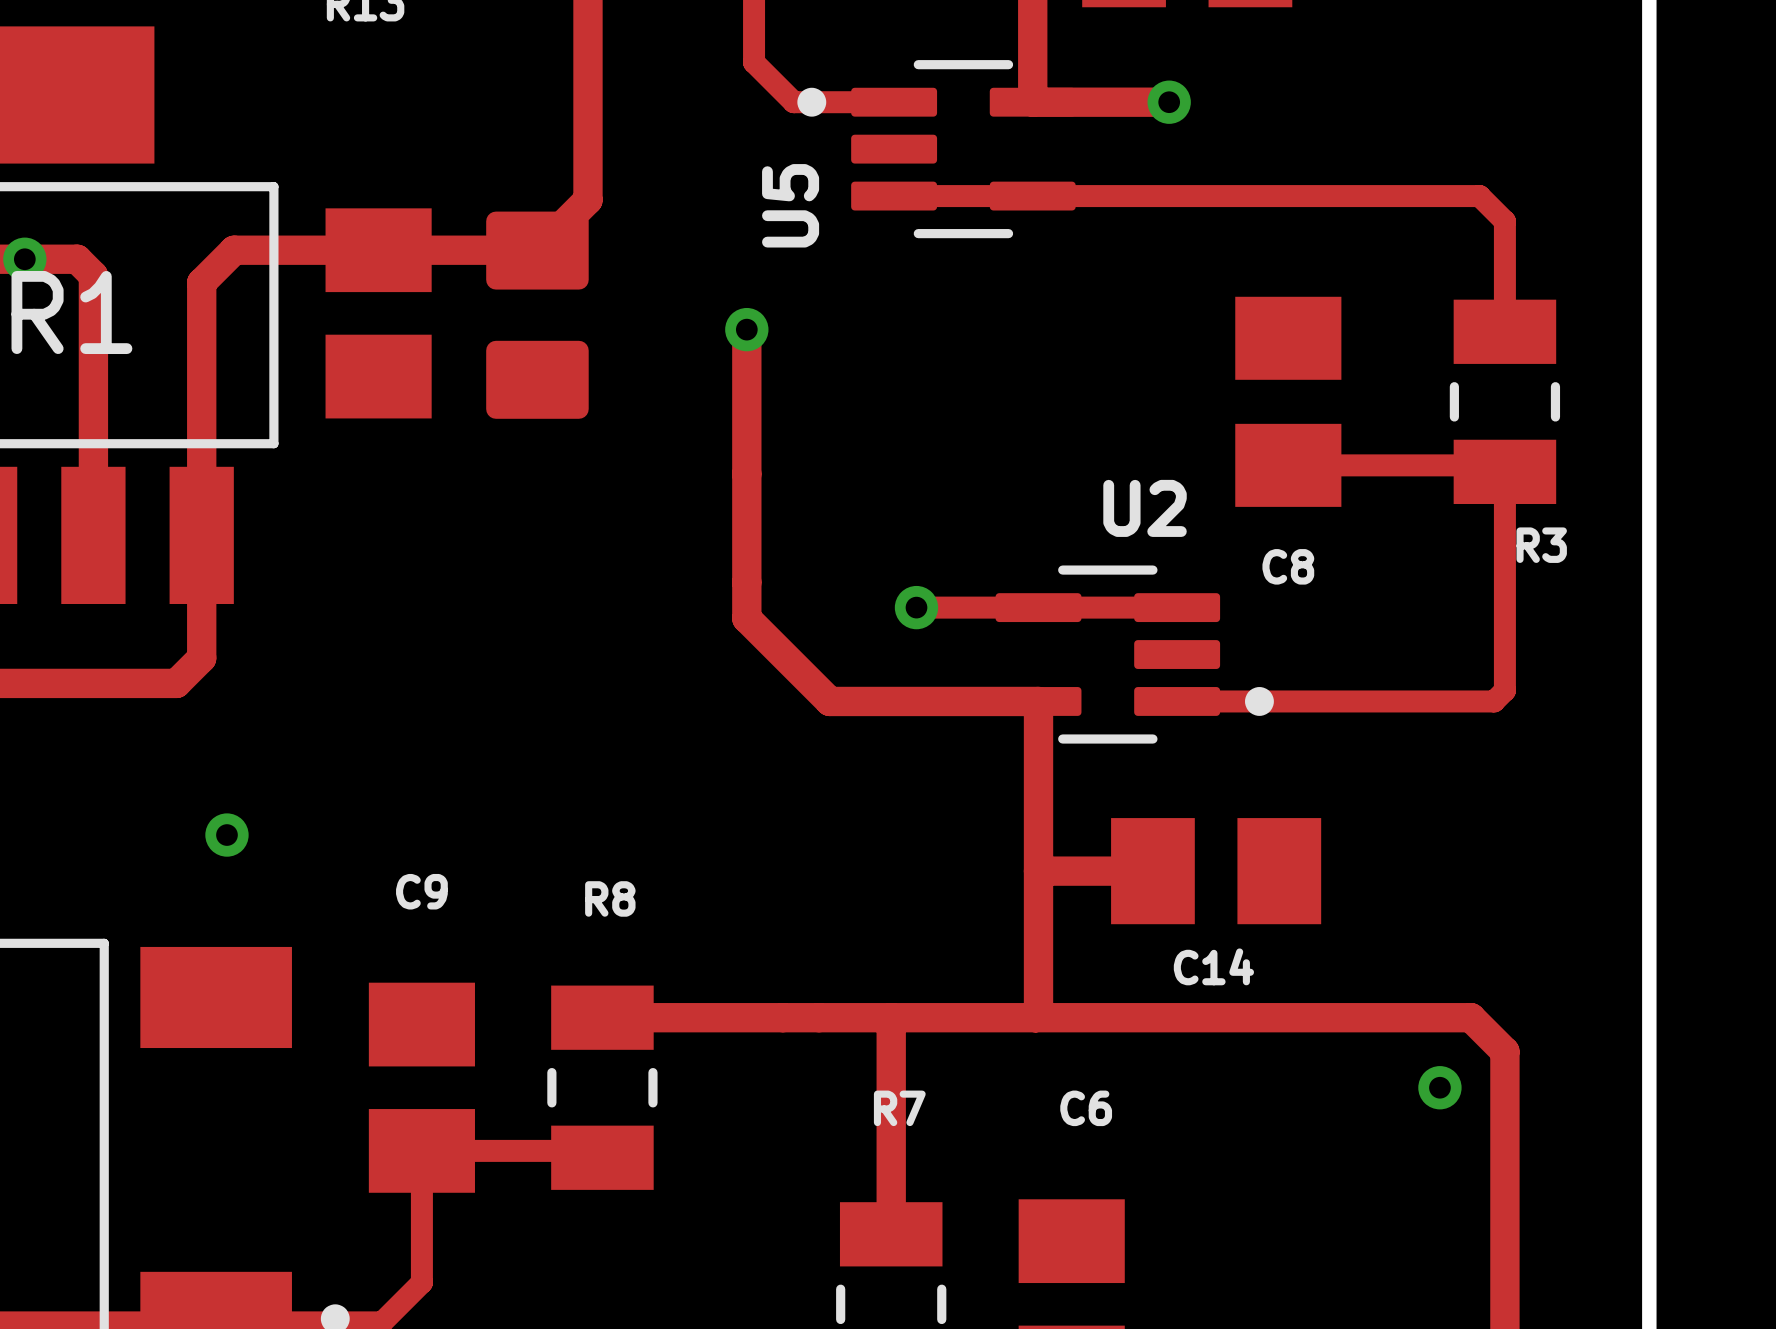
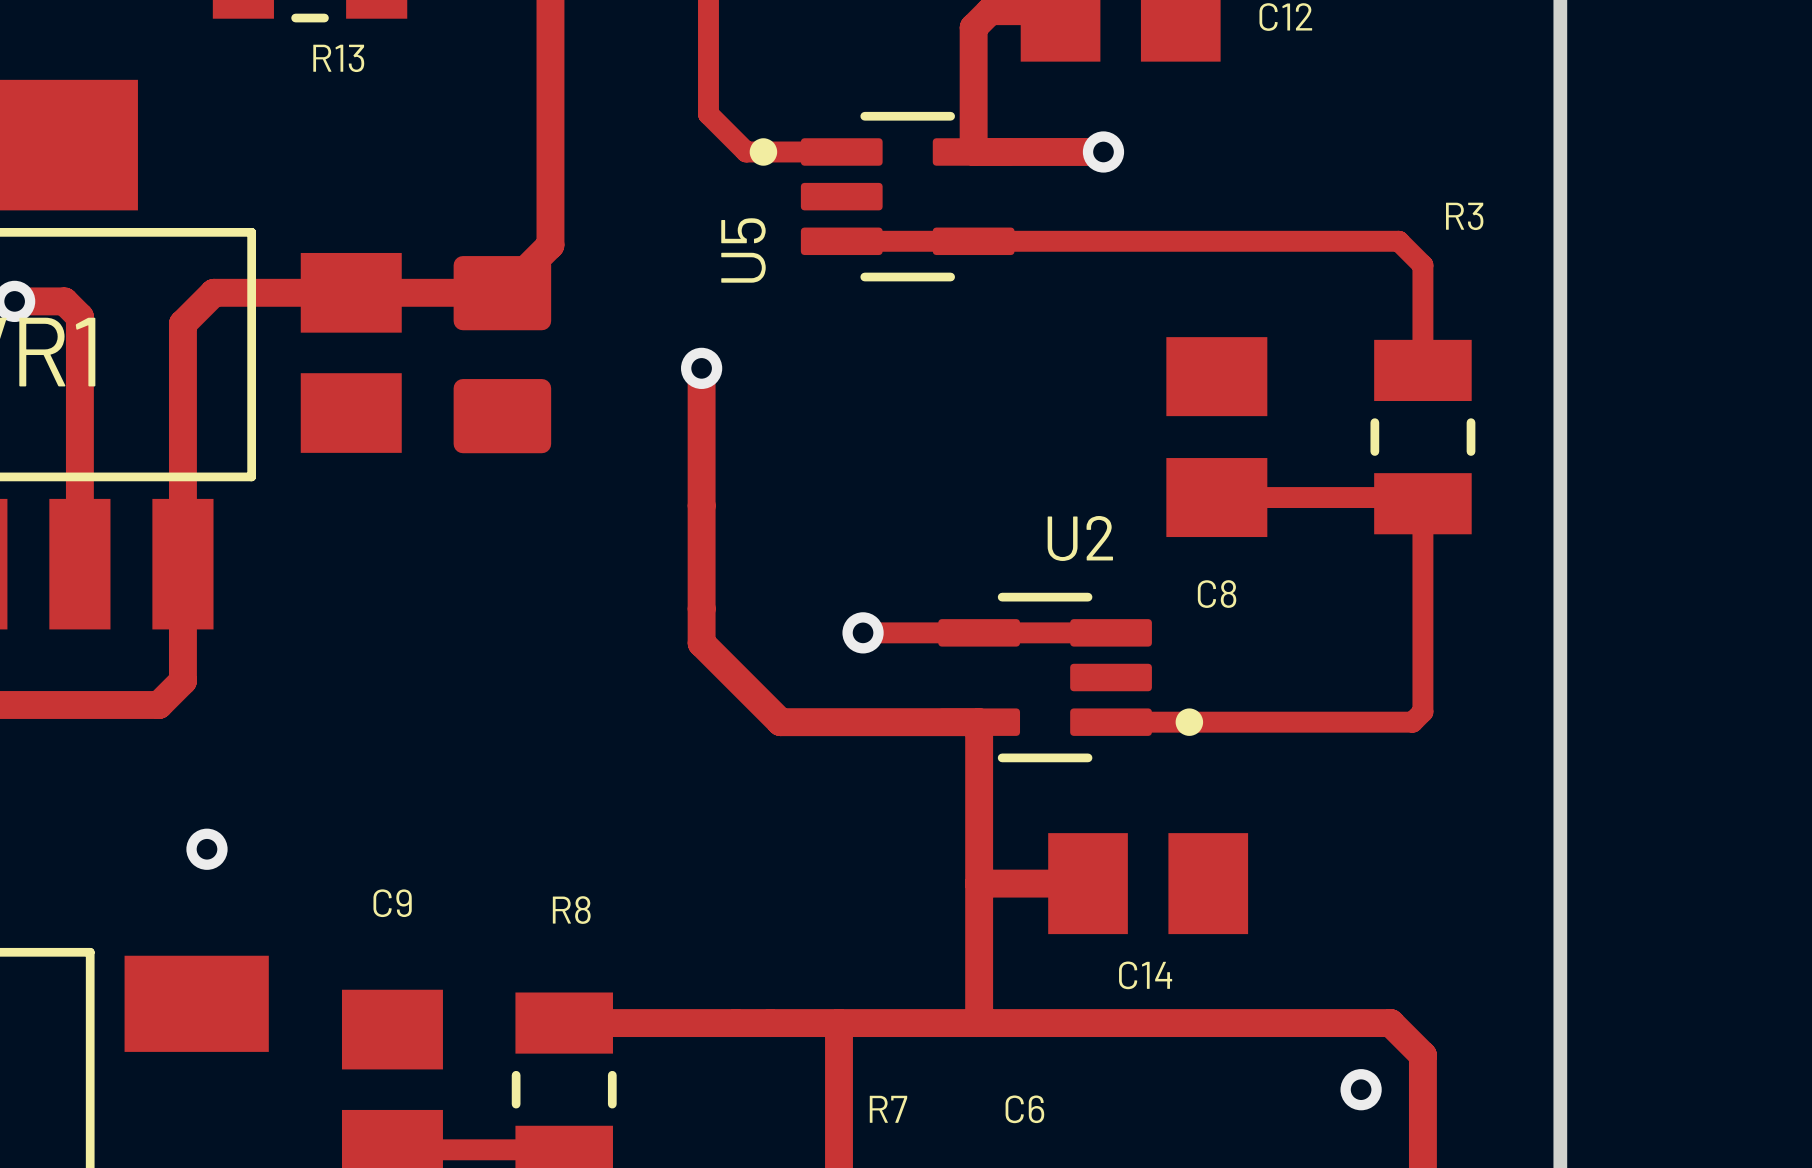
R3 name position: R3 (1541, 545) -> R3 (1464, 216)
R7 name position: R7 (899, 1108) -> R7 (888, 1109)

